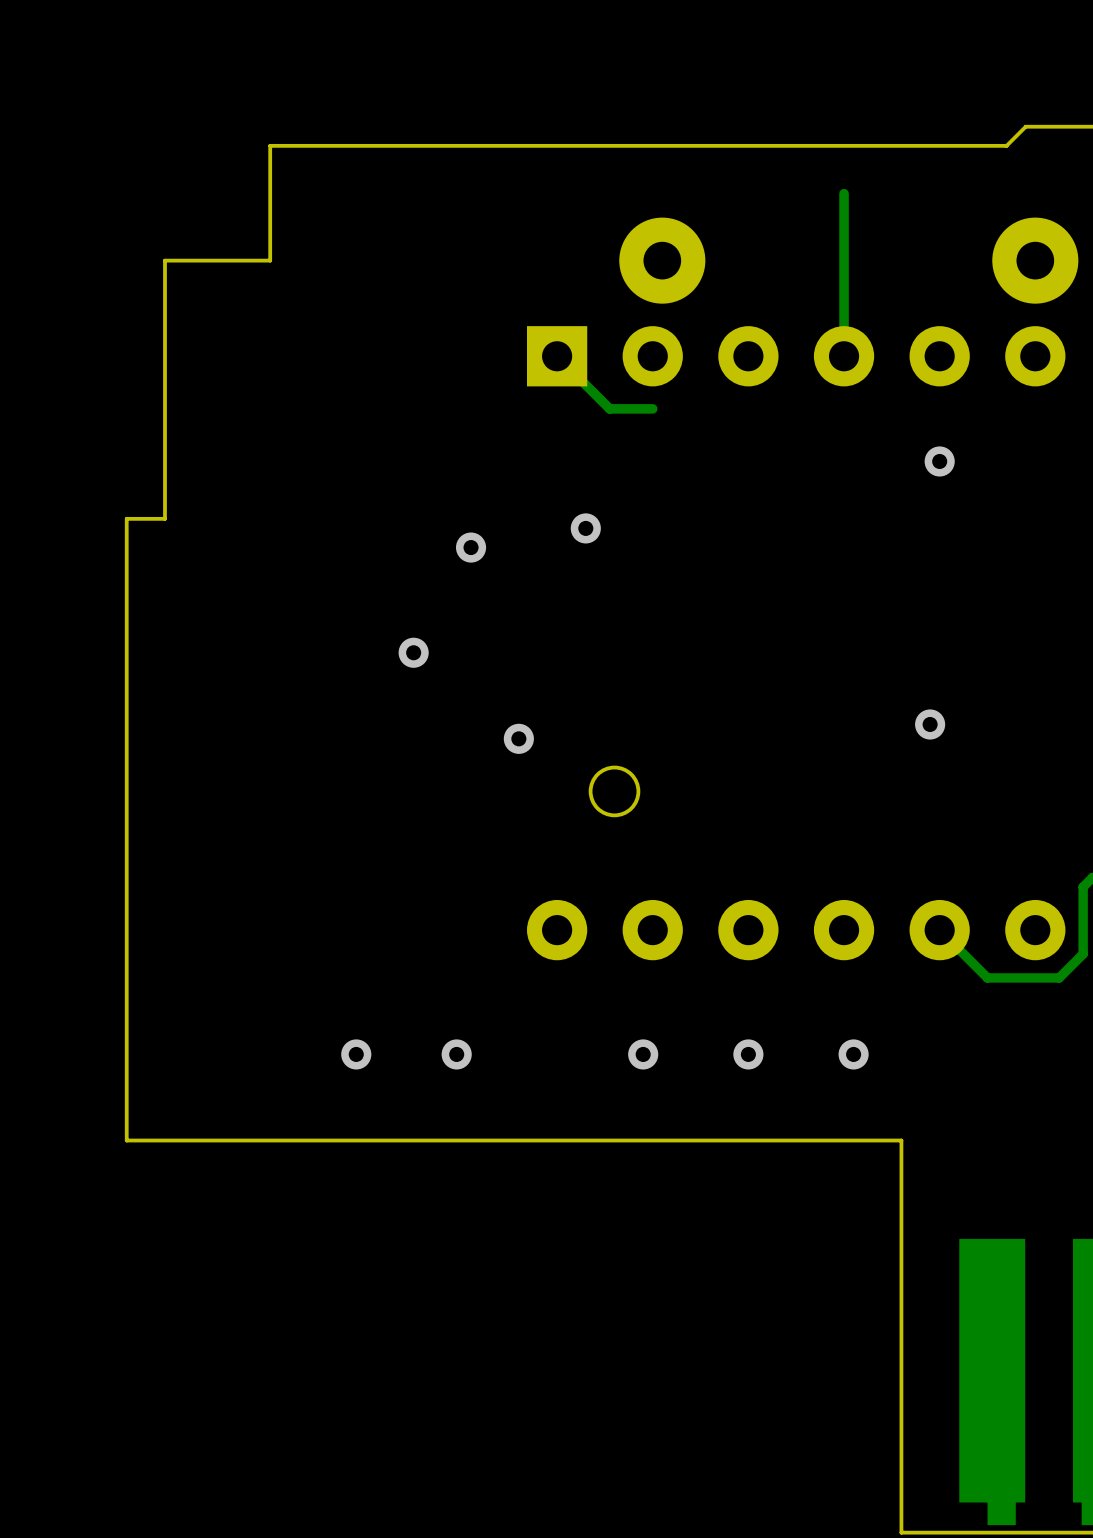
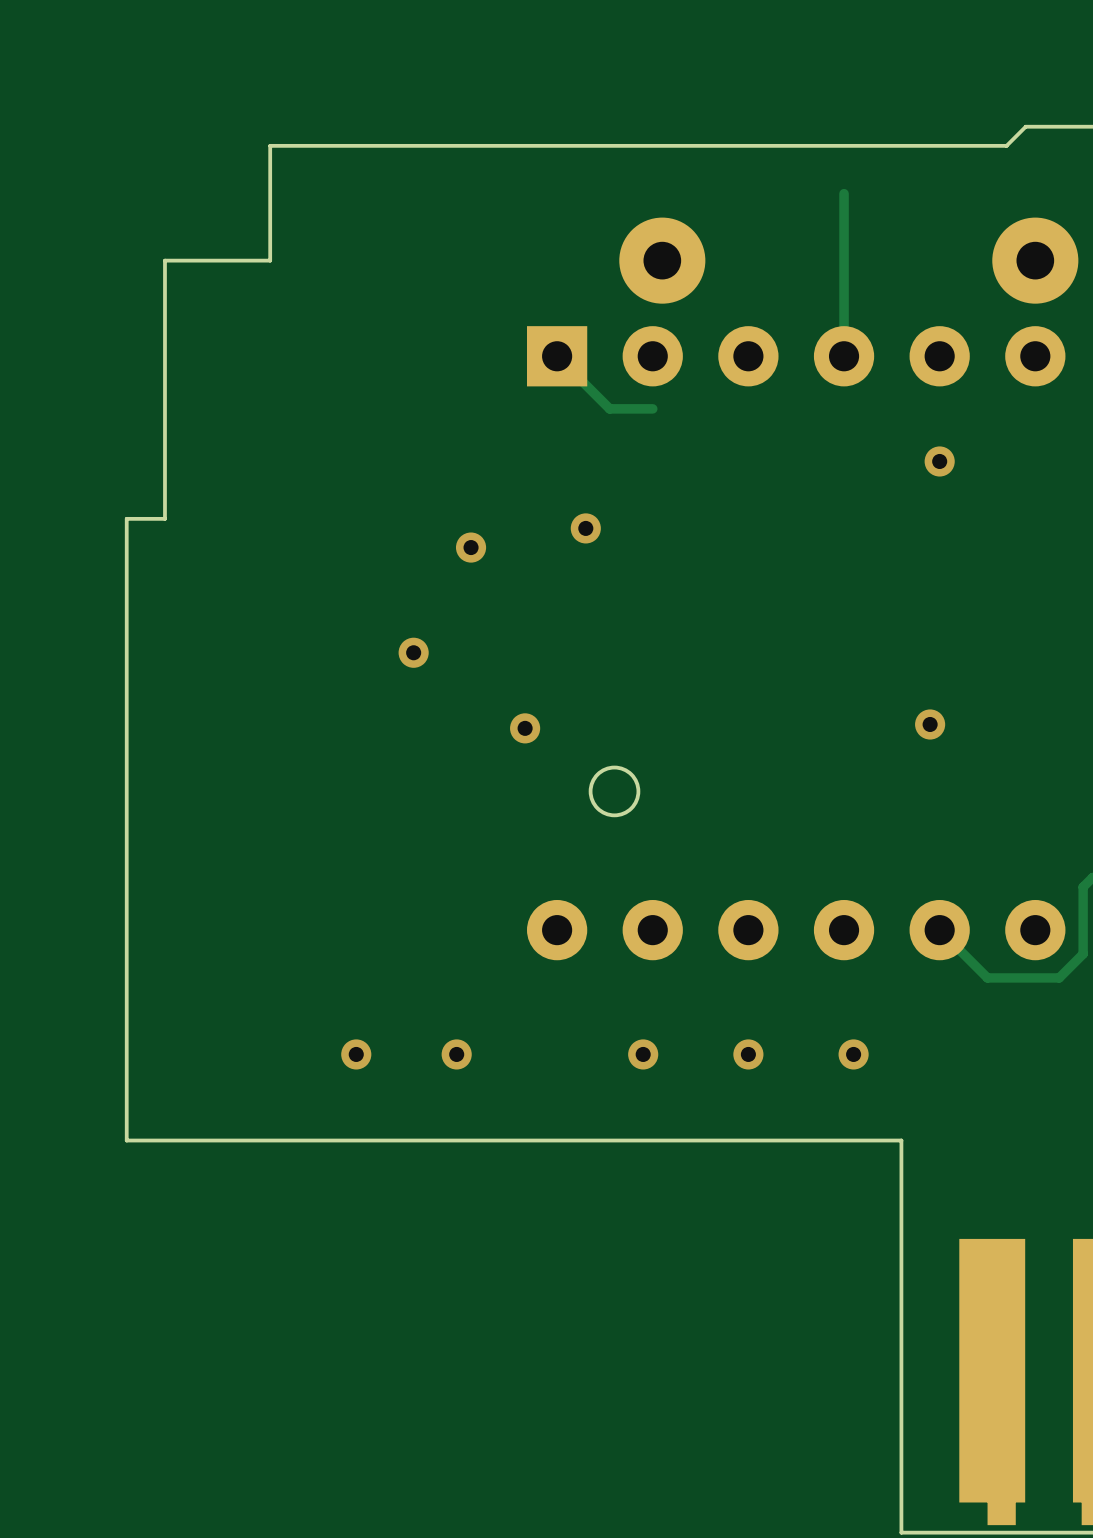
via position: (518, 738) -> (525, 728)

